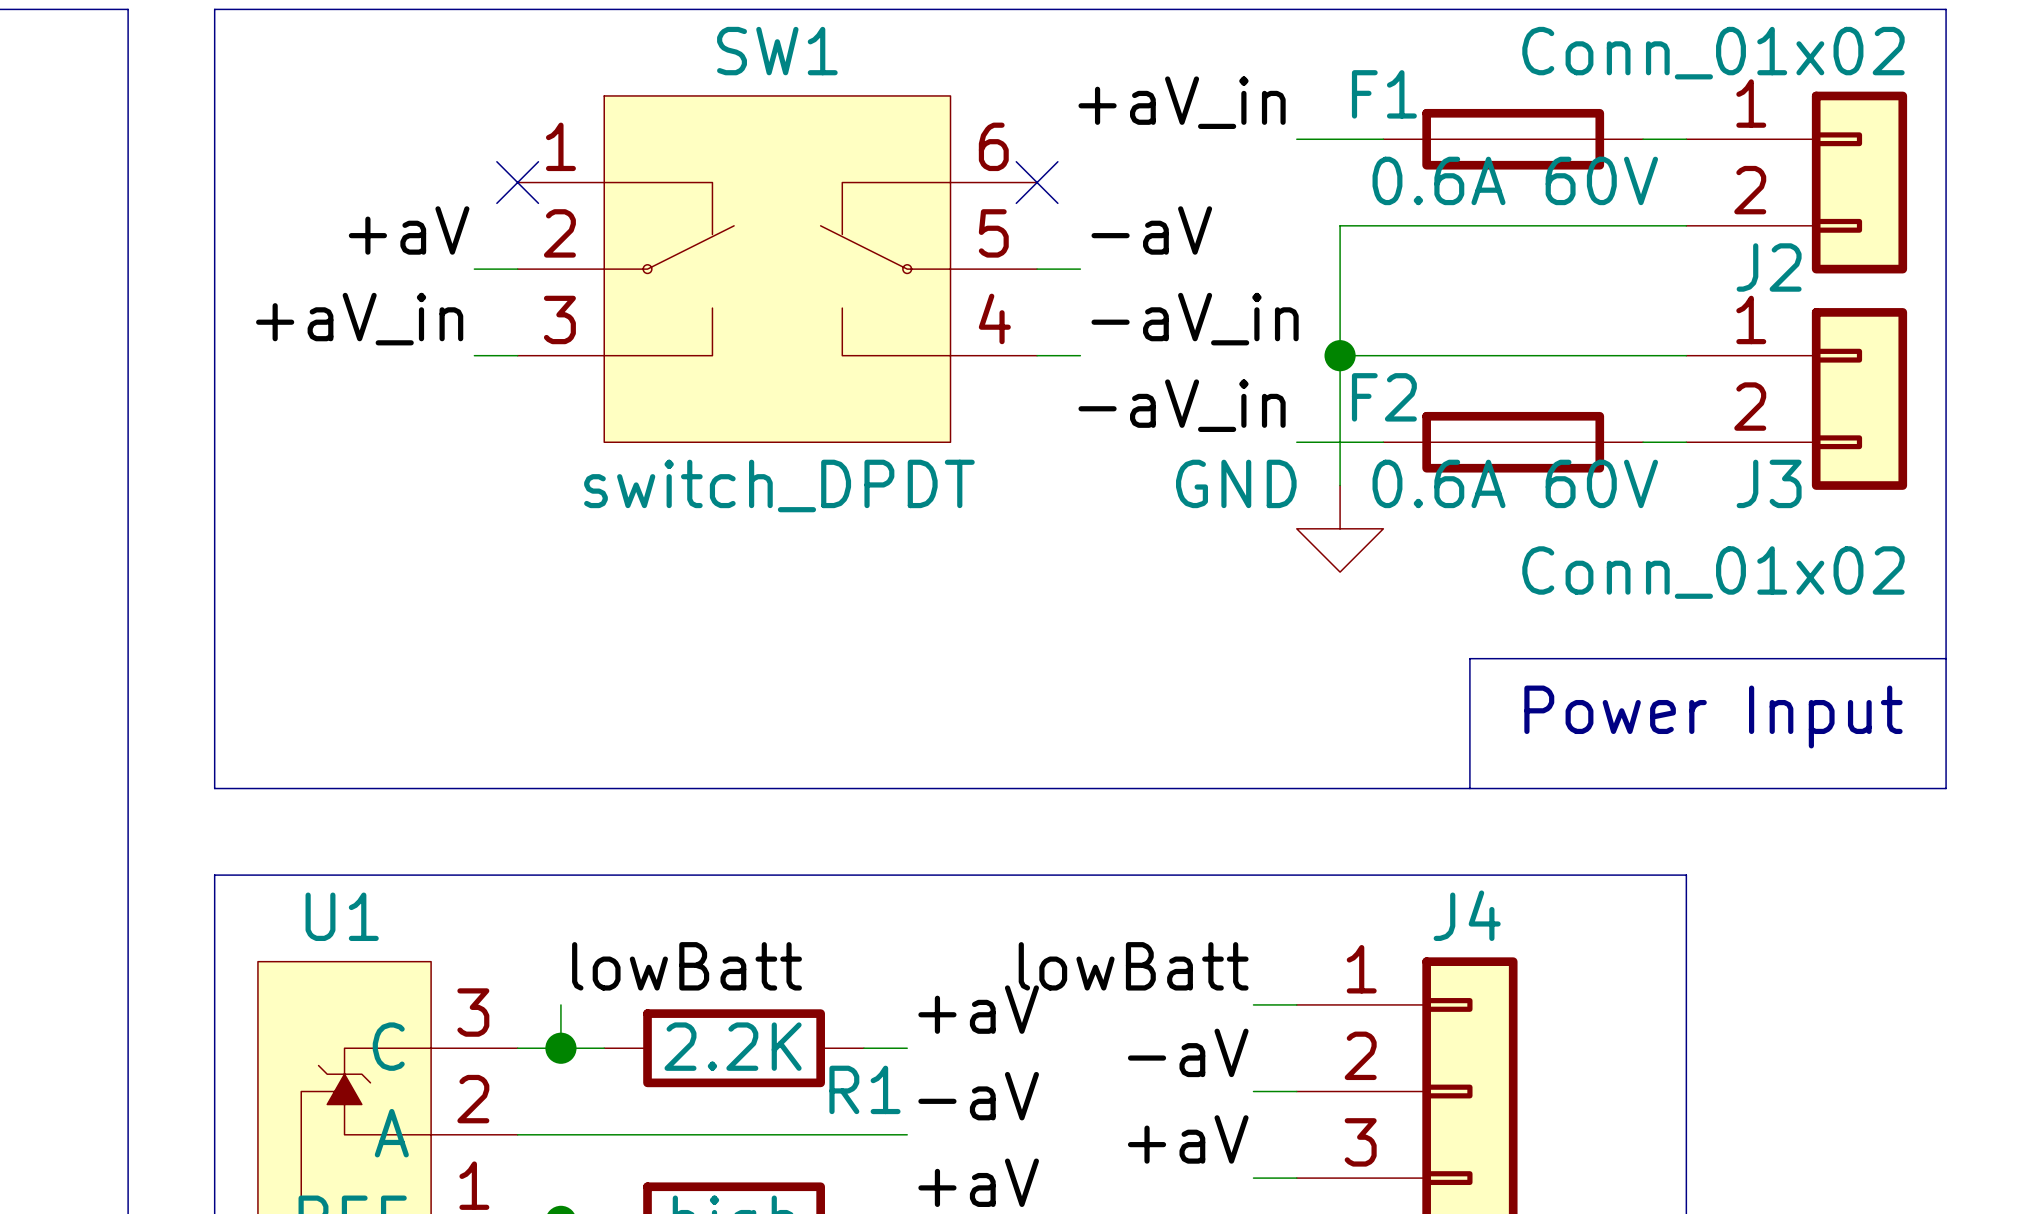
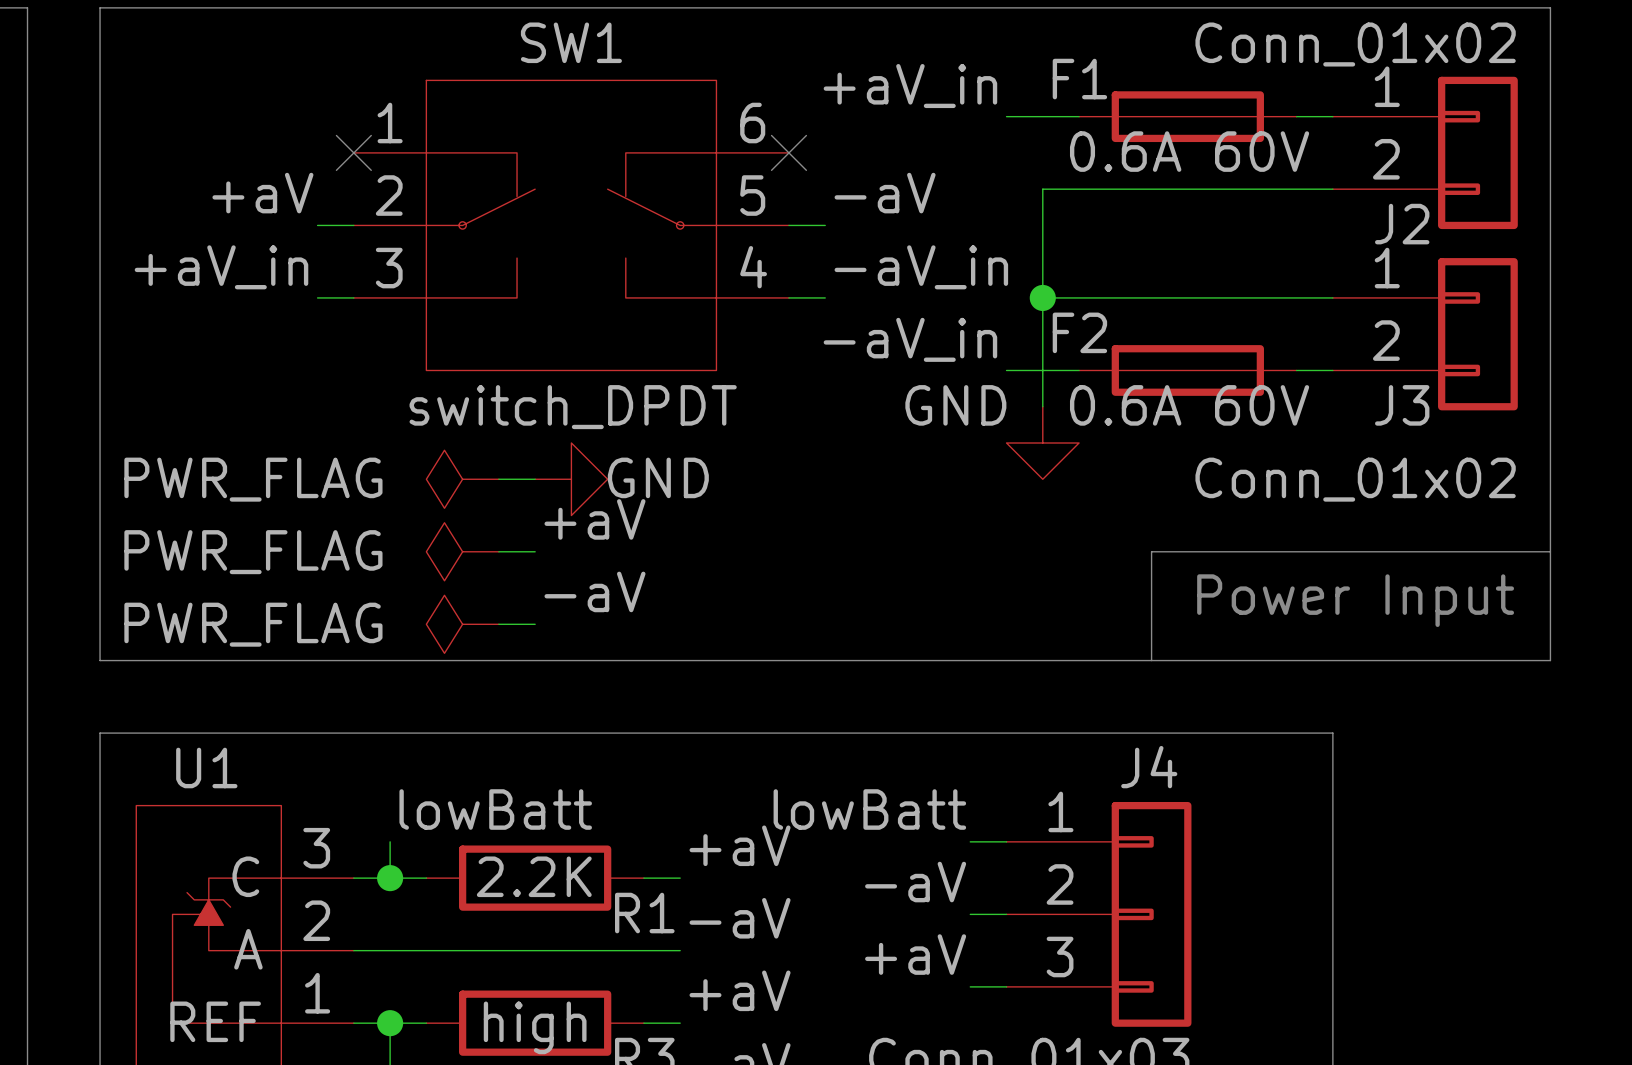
power symbol: none -> PWR_FLAG (462, 479)
wire: none -> (498, 479) (535, 479)
power symbol: none -> GND (571, 479)
label: none -> +aV (594, 519)
power symbol: none -> PWR_FLAG (462, 551)
wire: none -> (498, 551) (535, 551)
label: none -> -aV (594, 591)
power symbol: none -> PWR_FLAG (462, 624)
wire: none -> (498, 624) (535, 624)

